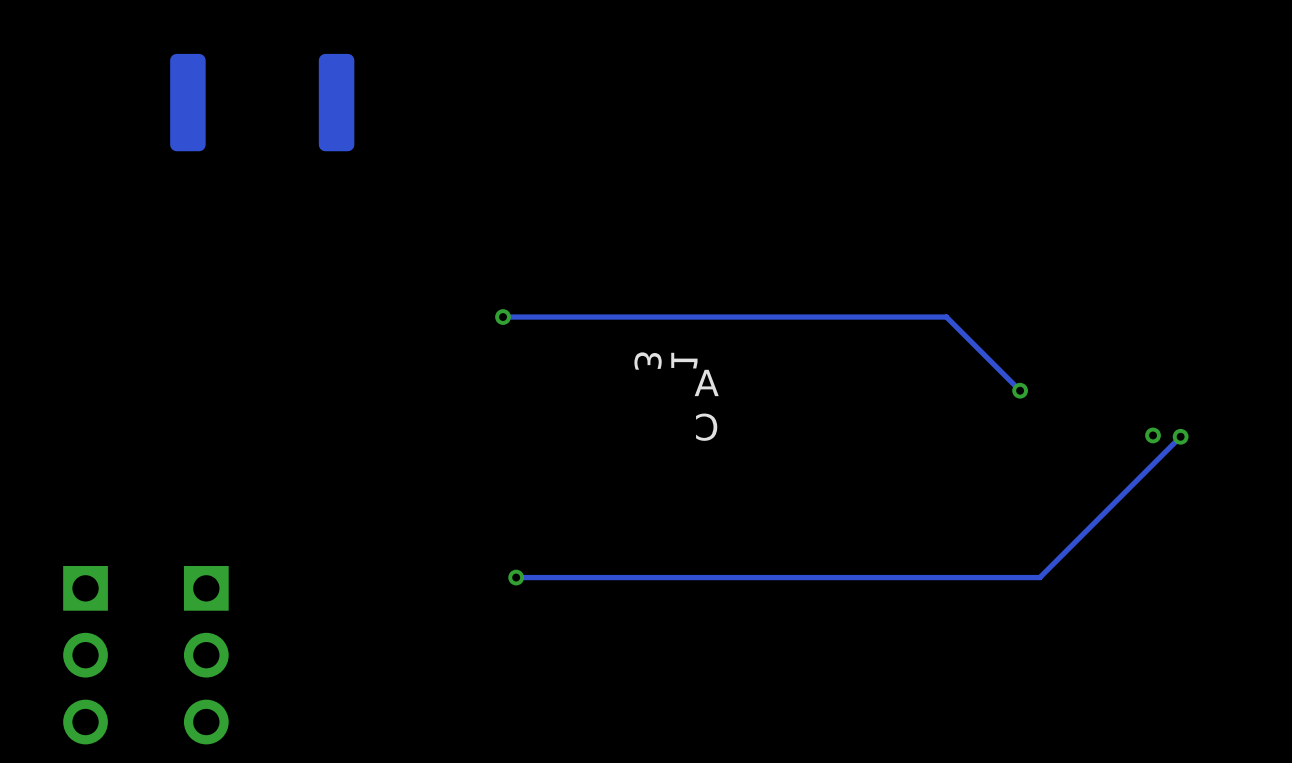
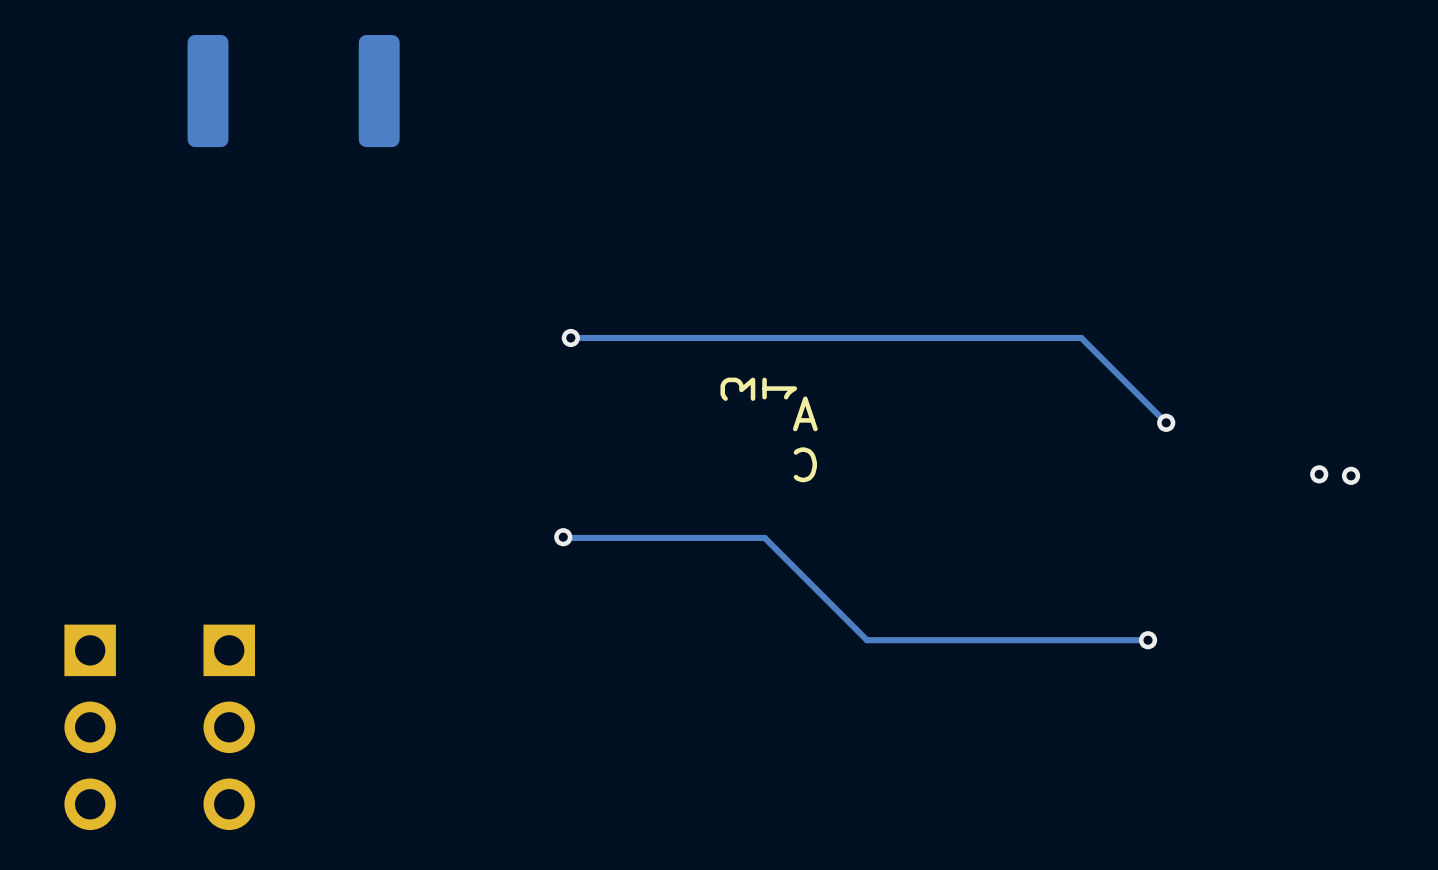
track: (1180, 436) (1039, 577) (516, 577) -> none
track: none -> (563, 537) (764, 537) (867, 640) (1148, 640)
via position: (516, 577) -> (563, 537)
via: none -> (1148, 640)

